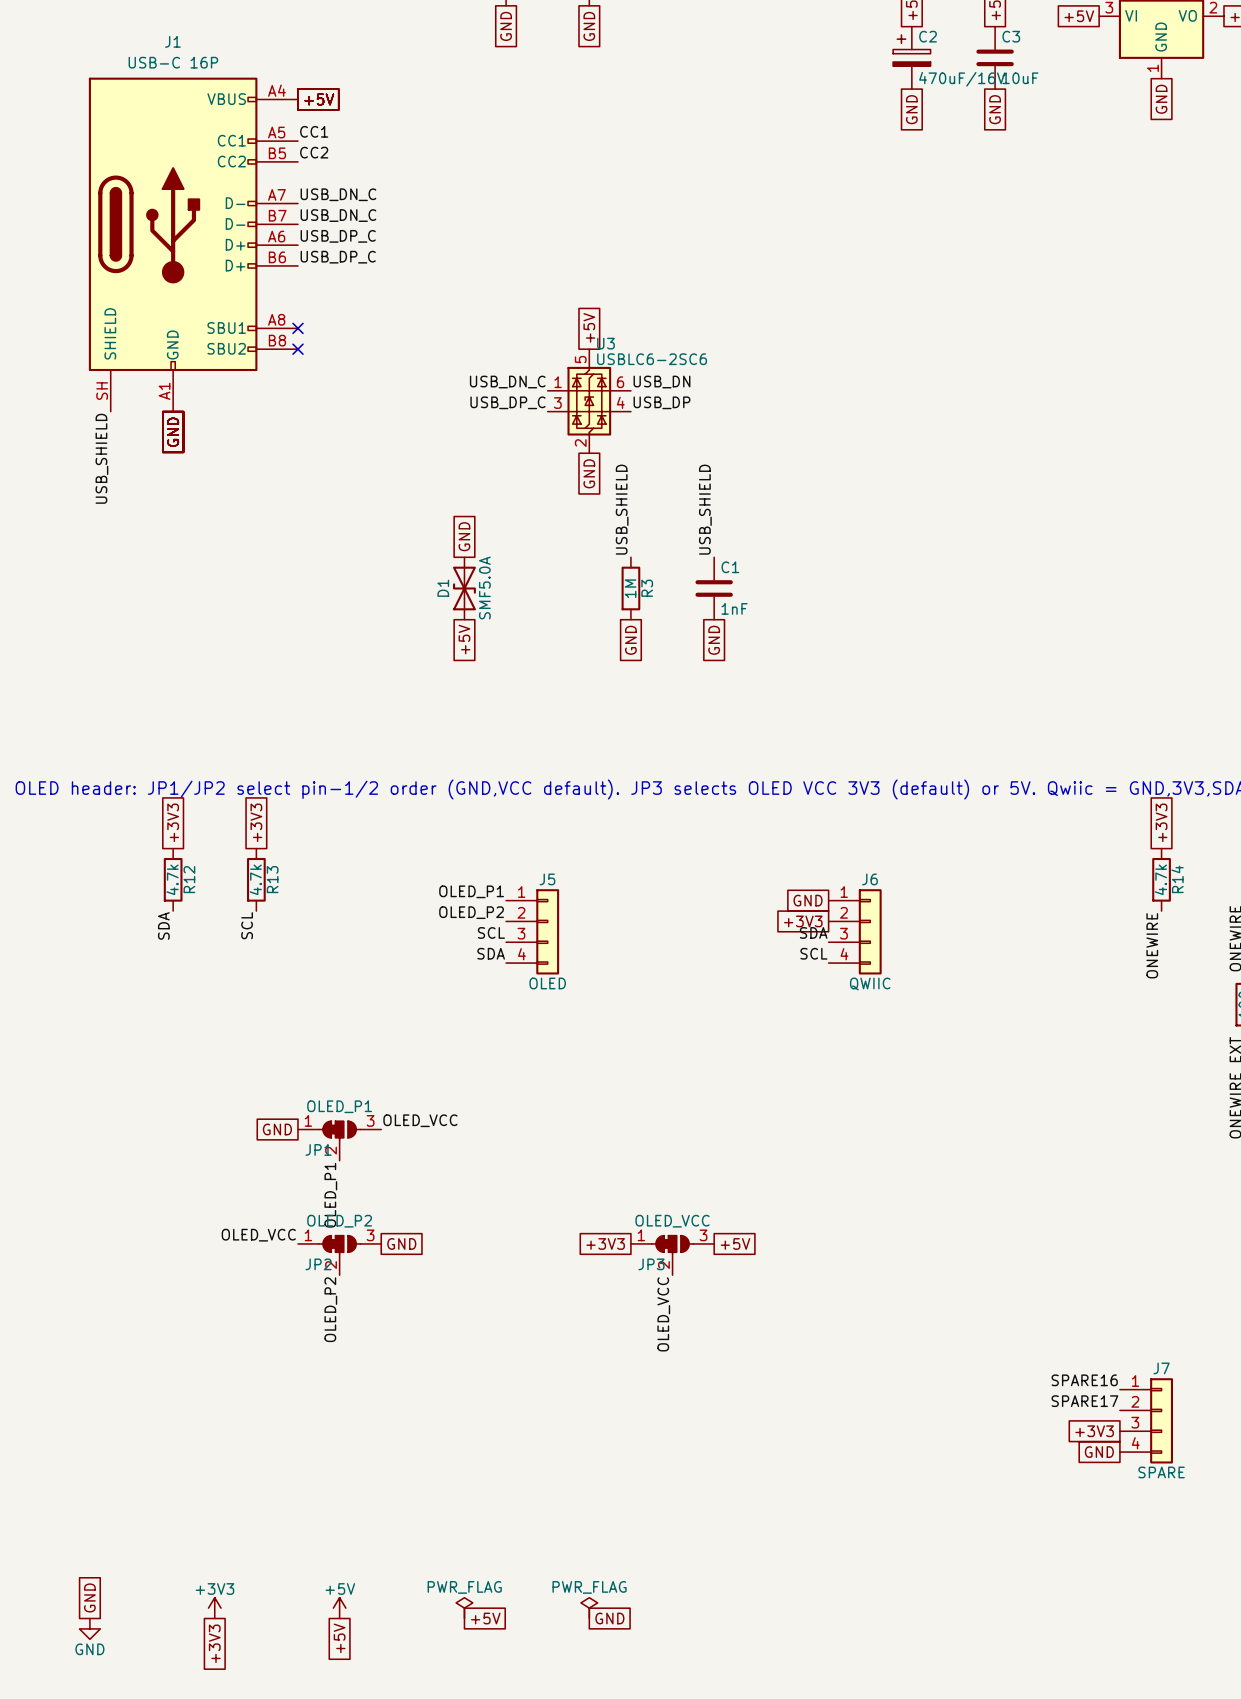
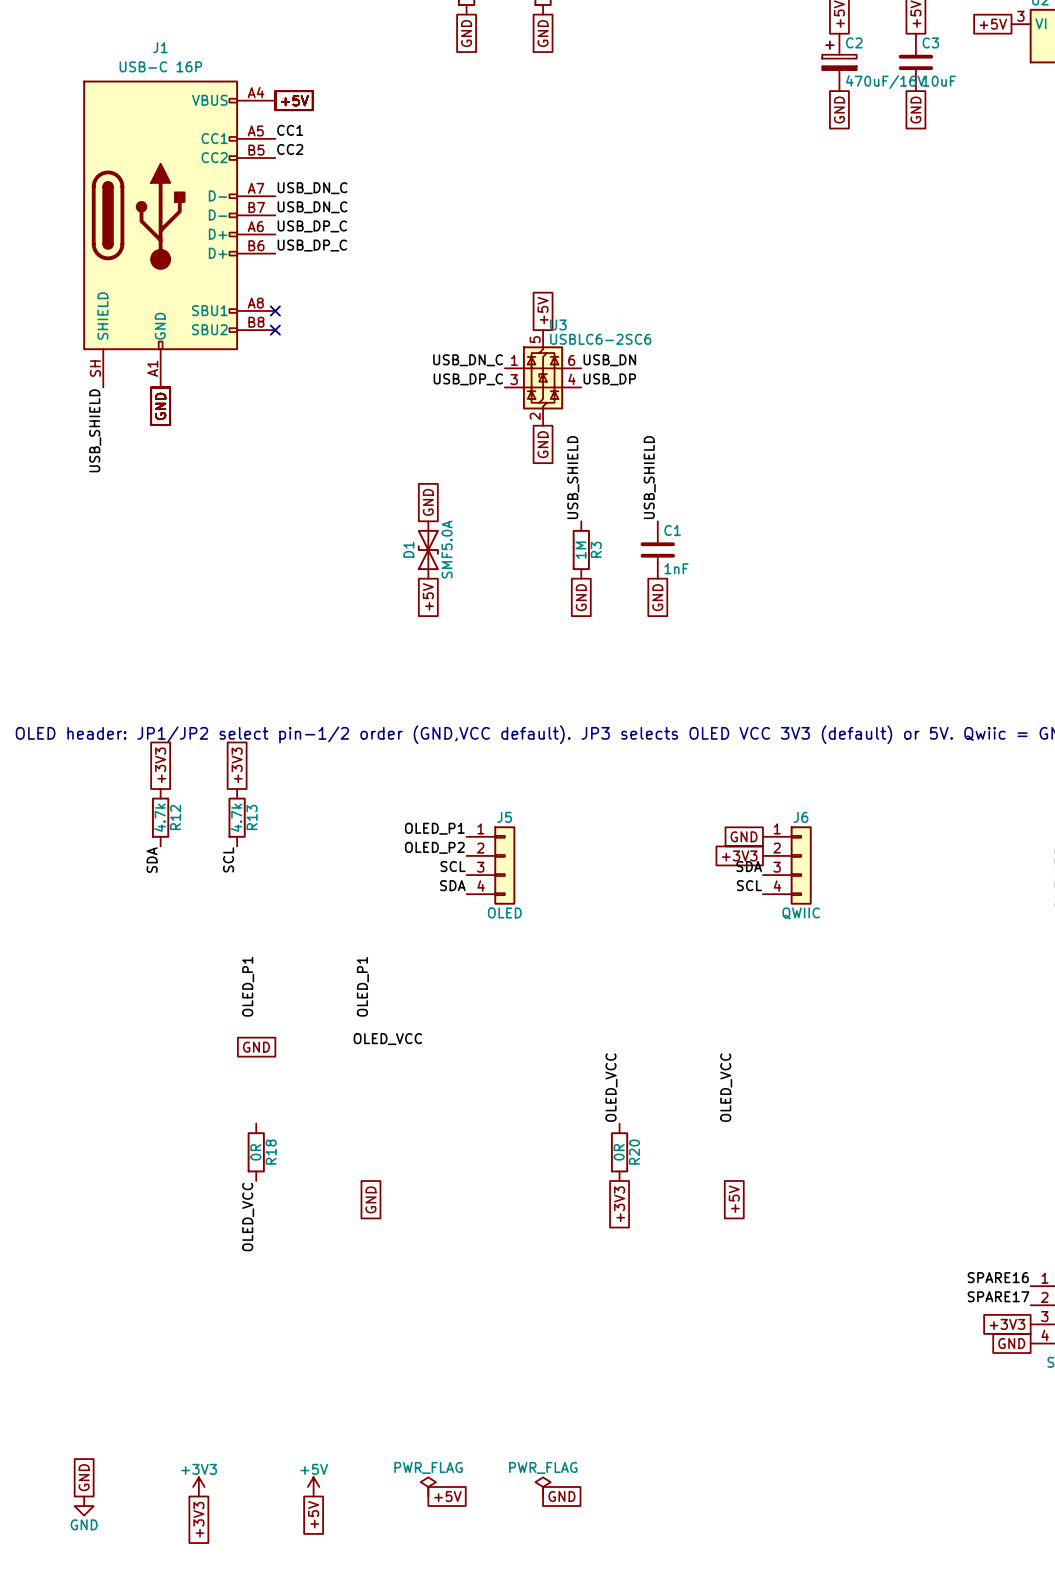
label: none -> OLED_P1 (248, 986)
label: none -> OLED_P1 (362, 986)
JP1: OLED_P1 (339, 1140) -> none
label: none -> OLED_VCC (726, 1087)
label: OLED_P1 (330, 1195) -> none
label rotation: 0° (258, 1235) -> 90° counterclockwise (248, 1217)
R18: none -> 0R (256, 1152)
global label rotation: 0° (401, 1243) -> 90° clockwise (370, 1199)
global label position: GND (401, 1243) -> GND (370, 1199)
global label rotation: 0° (605, 1243) -> 90° counterclockwise (619, 1204)
global label position: +3V3 (605, 1243) -> +3V3 (619, 1204)
R20: none -> 0R (619, 1152)
global label rotation: 0° (735, 1243) -> 90° clockwise (734, 1199)
global label position: +5V (735, 1243) -> +5V (734, 1199)
JP2: OLED_P2 (339, 1255) -> none
JP3: OLED_VCC (672, 1255) -> none
label: OLED_P2 (330, 1309) -> none
label position: OLED_VCC (663, 1314) -> OLED_VCC (611, 1087)

